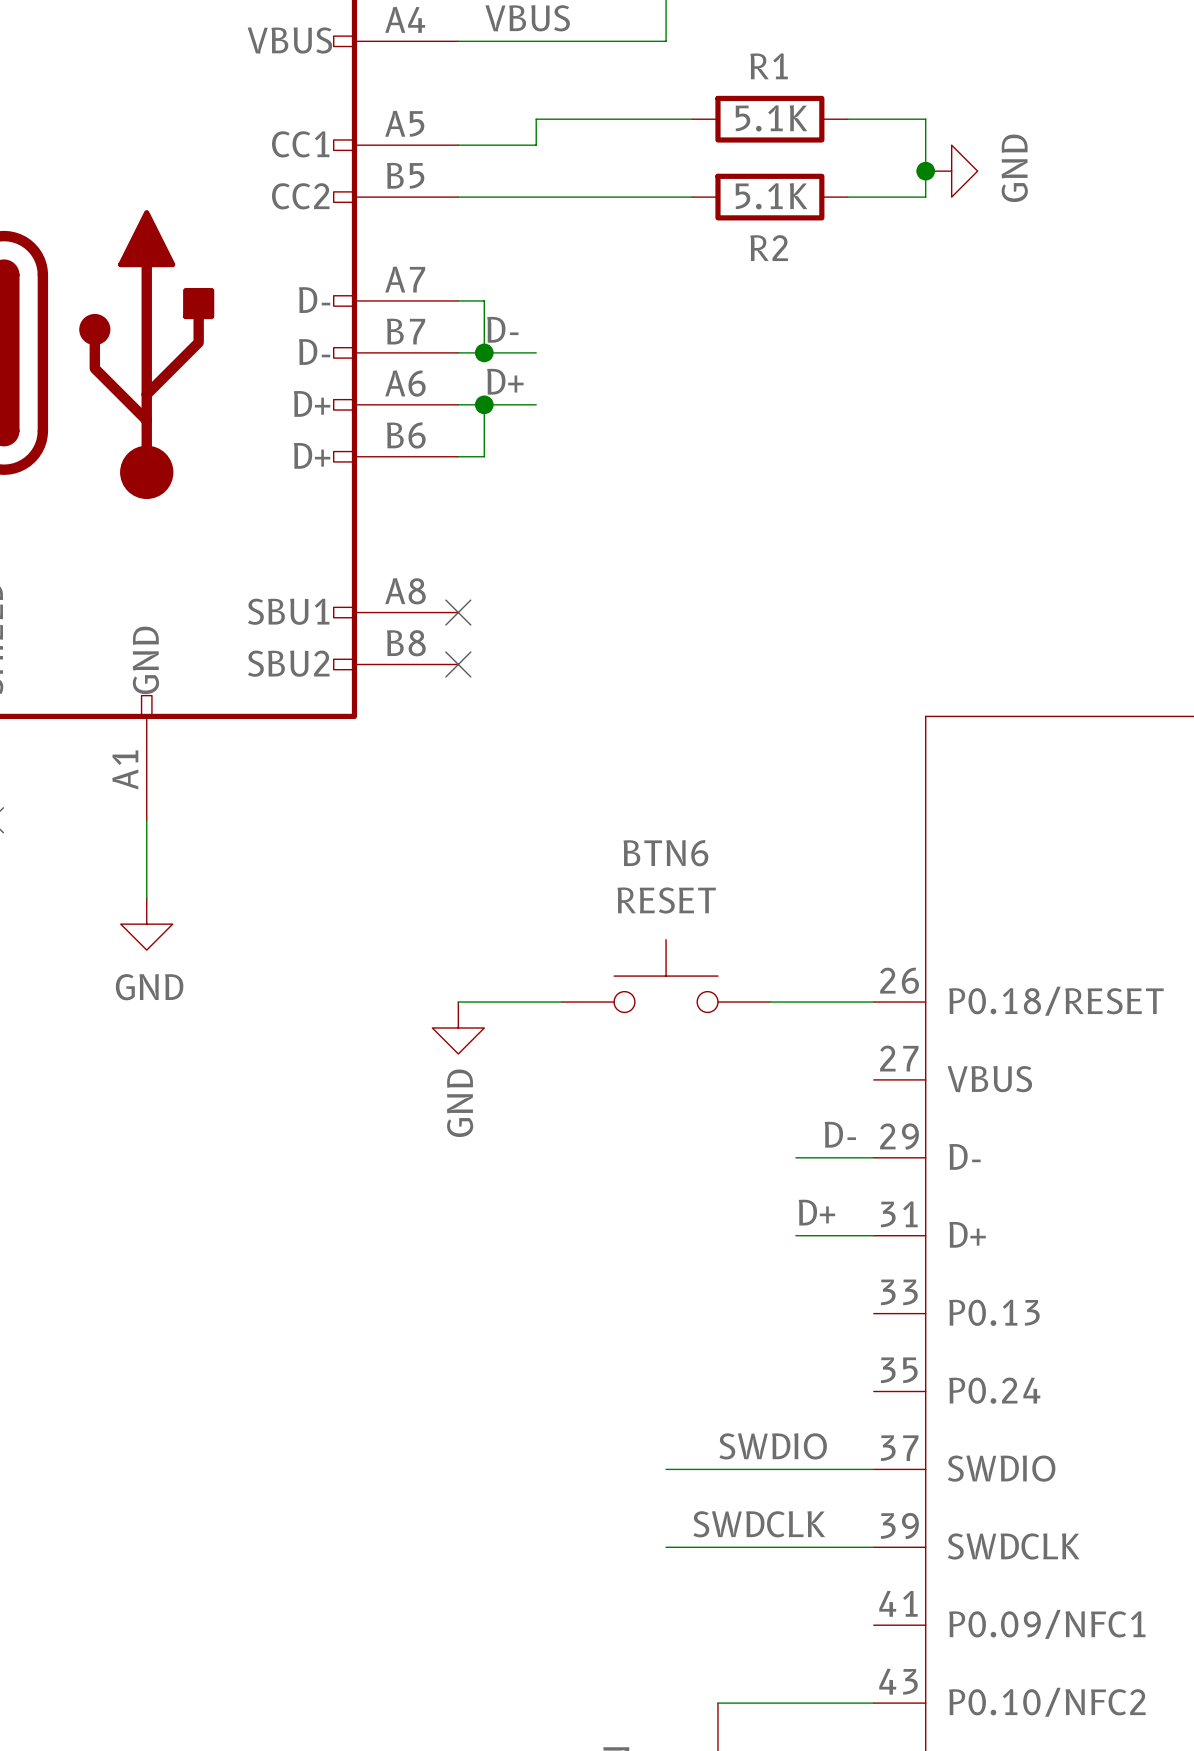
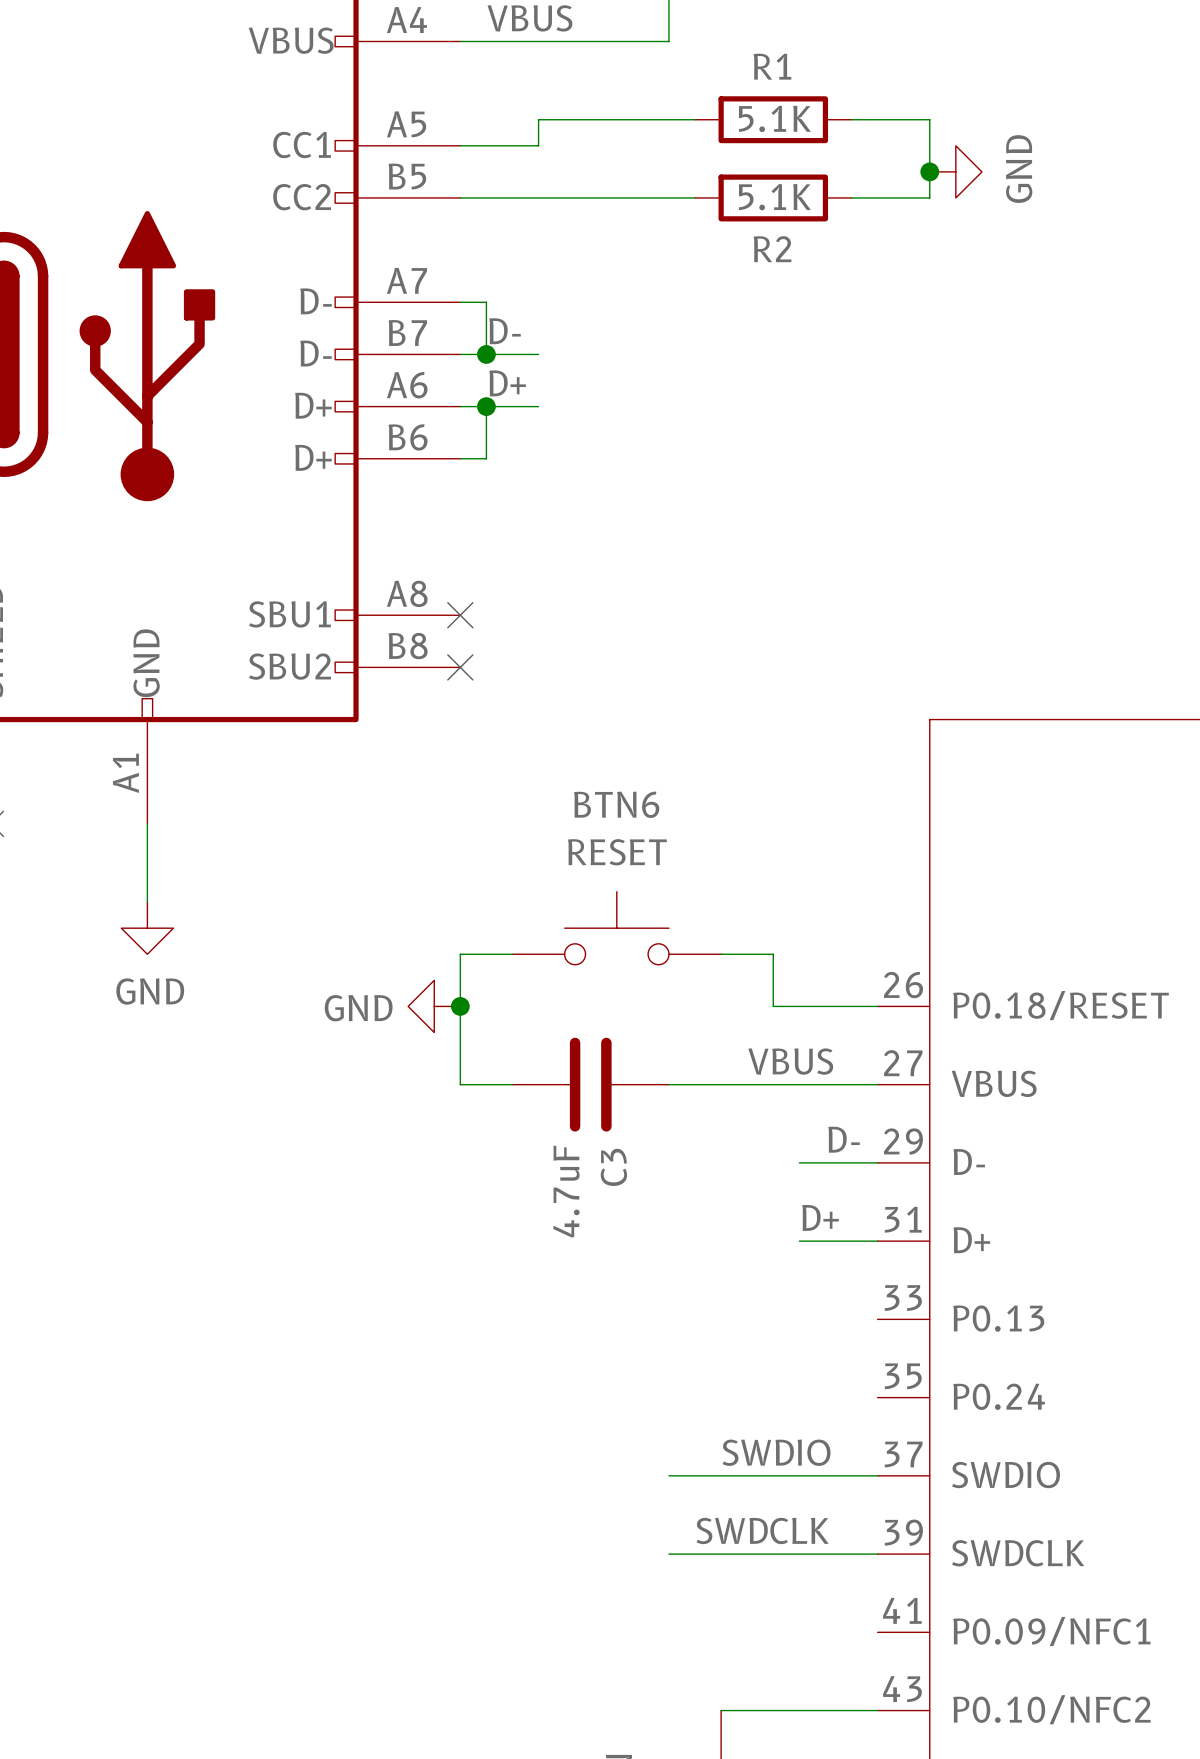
wire: none -> (512, 954) (460, 954) (460, 1084) (512, 1084)
wire: none -> (721, 954) (773, 954) (773, 1006)
BTN6 position: (666, 976) -> (616, 928)
wire: (458, 1002) (562, 1002) -> none
junction: none -> (460, 1006)
power symbol rotation: 0° (458, 1027) -> 90° clockwise (434, 1006)
power symbol position: GND (458, 1027) -> GND (434, 1006)
label: none -> VBUS (790, 1061)
C3: none -> 4.7uF (590, 1084)
wire: none -> (668, 1084) (877, 1084)

